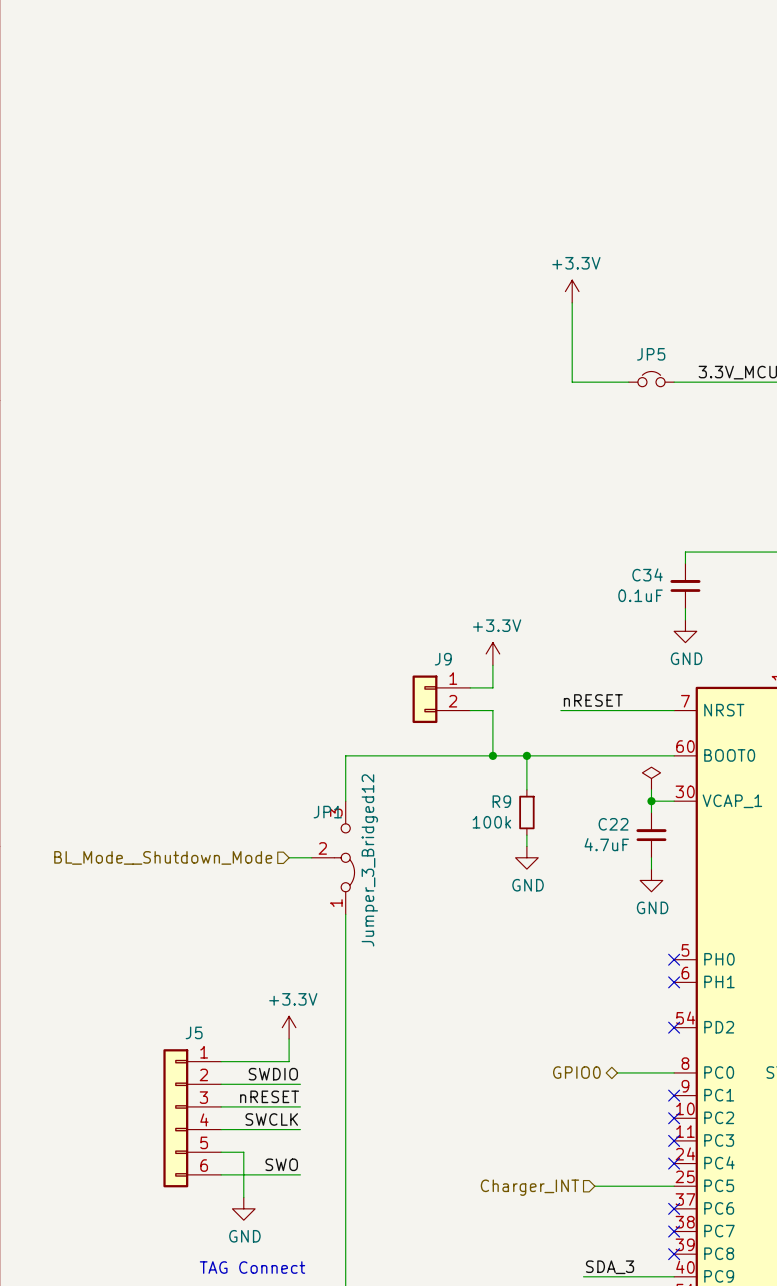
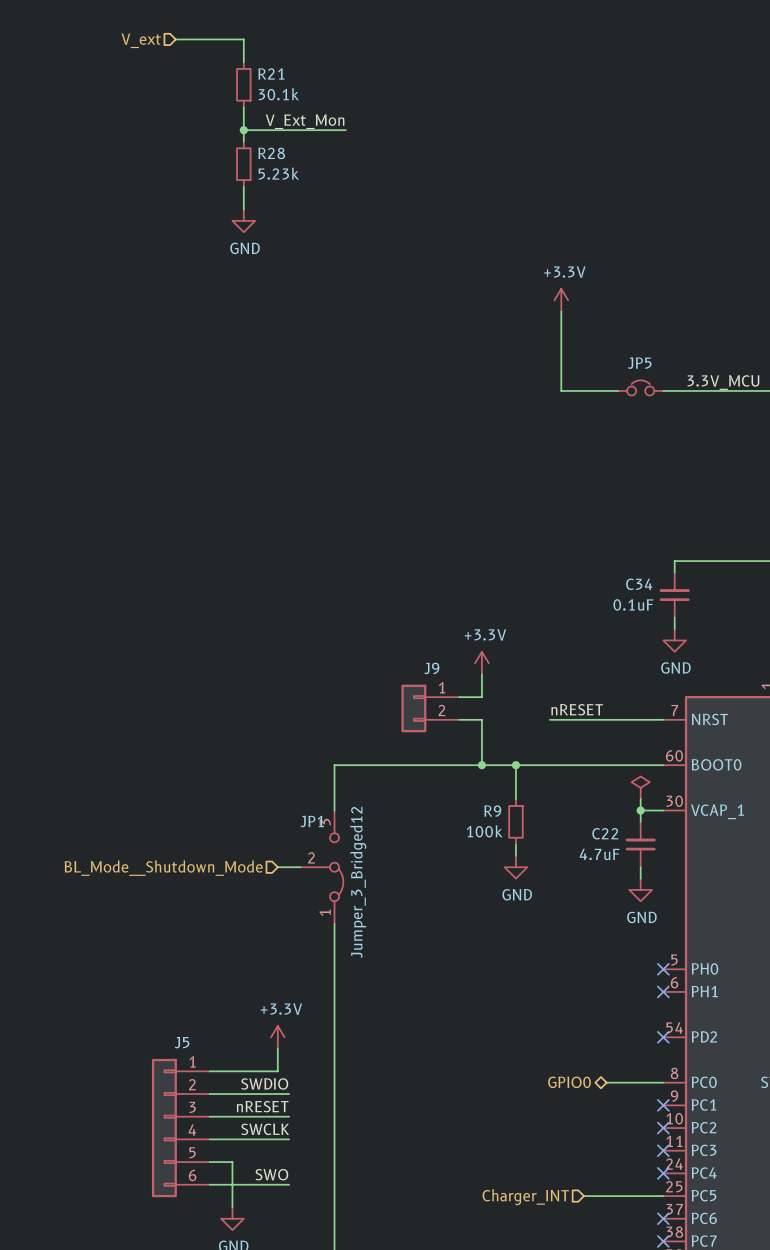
hierarchical label: none -> V_ext (141, 40)
wire: none -> (175, 39) (243, 39) (243, 62)
R21: none -> 30.1k (243, 84)
wire: none -> (243, 107) (243, 141)
label: none -> V_Ext_Mon (305, 121)
wire: none -> (243, 130) (345, 130)
junction: none -> (243, 130)
R28: none -> 5.23k (243, 164)
wire: none -> (243, 186) (243, 209)
power symbol: none -> GND (243, 220)

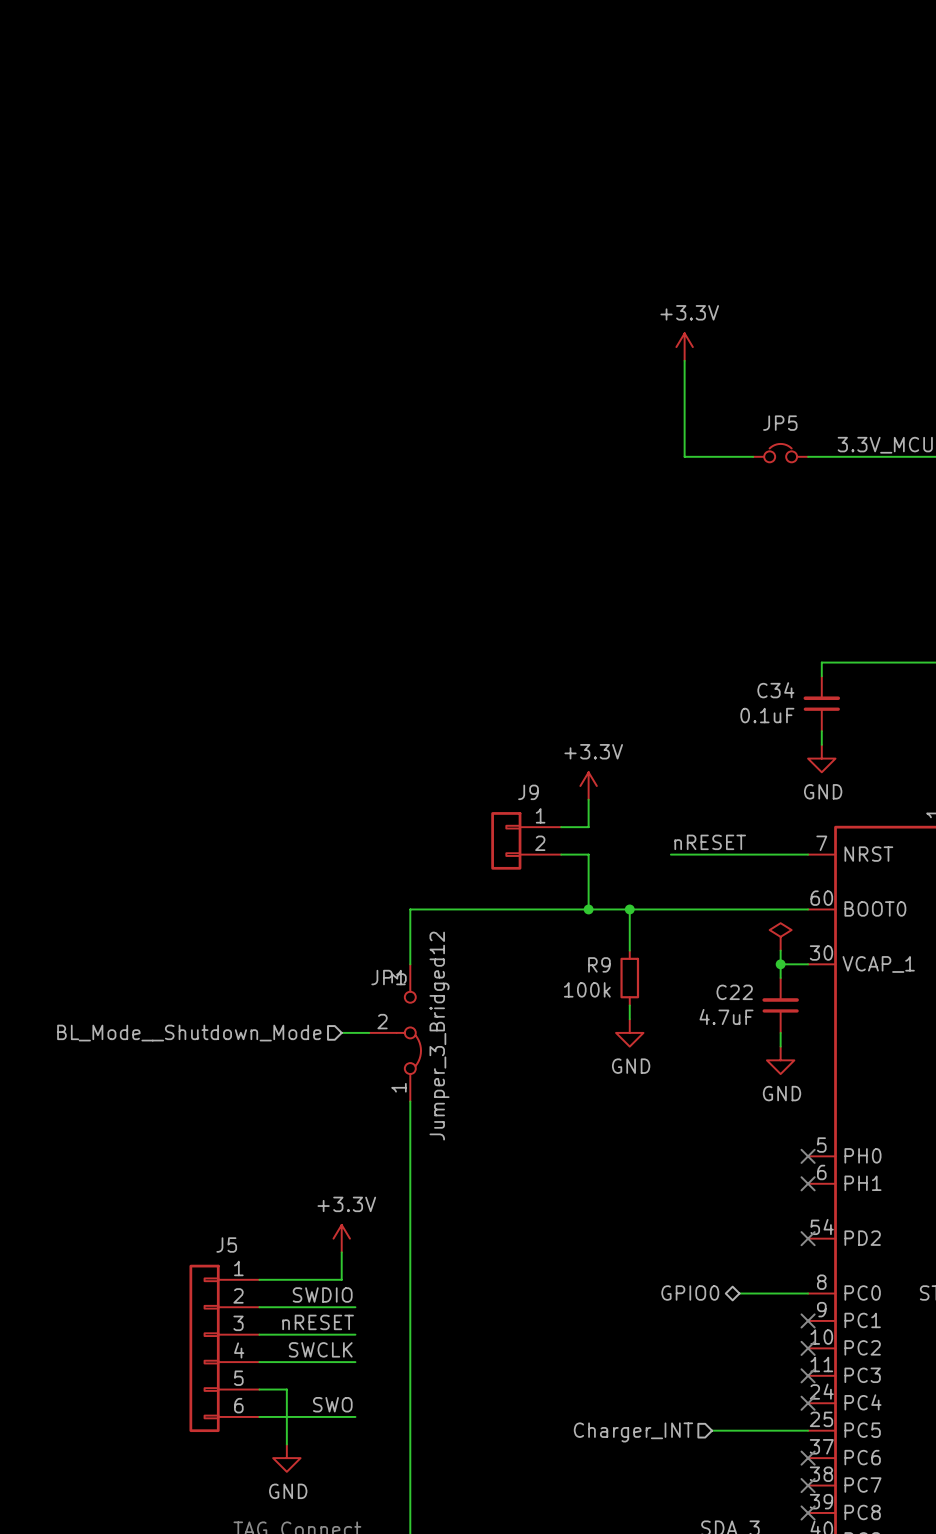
wire: (175, 39) (243, 39) (243, 62) -> none
hierarchical label: V_ext (141, 40) -> none
R21: 30.1k (243, 84) -> none
wire: (243, 107) (243, 141) -> none
label: V_Ext_Mon (305, 121) -> none
wire: (243, 130) (345, 130) -> none
junction: (243, 130) -> none
R28: 5.23k (243, 164) -> none
wire: (243, 186) (243, 209) -> none
power symbol: GND (243, 220) -> none

